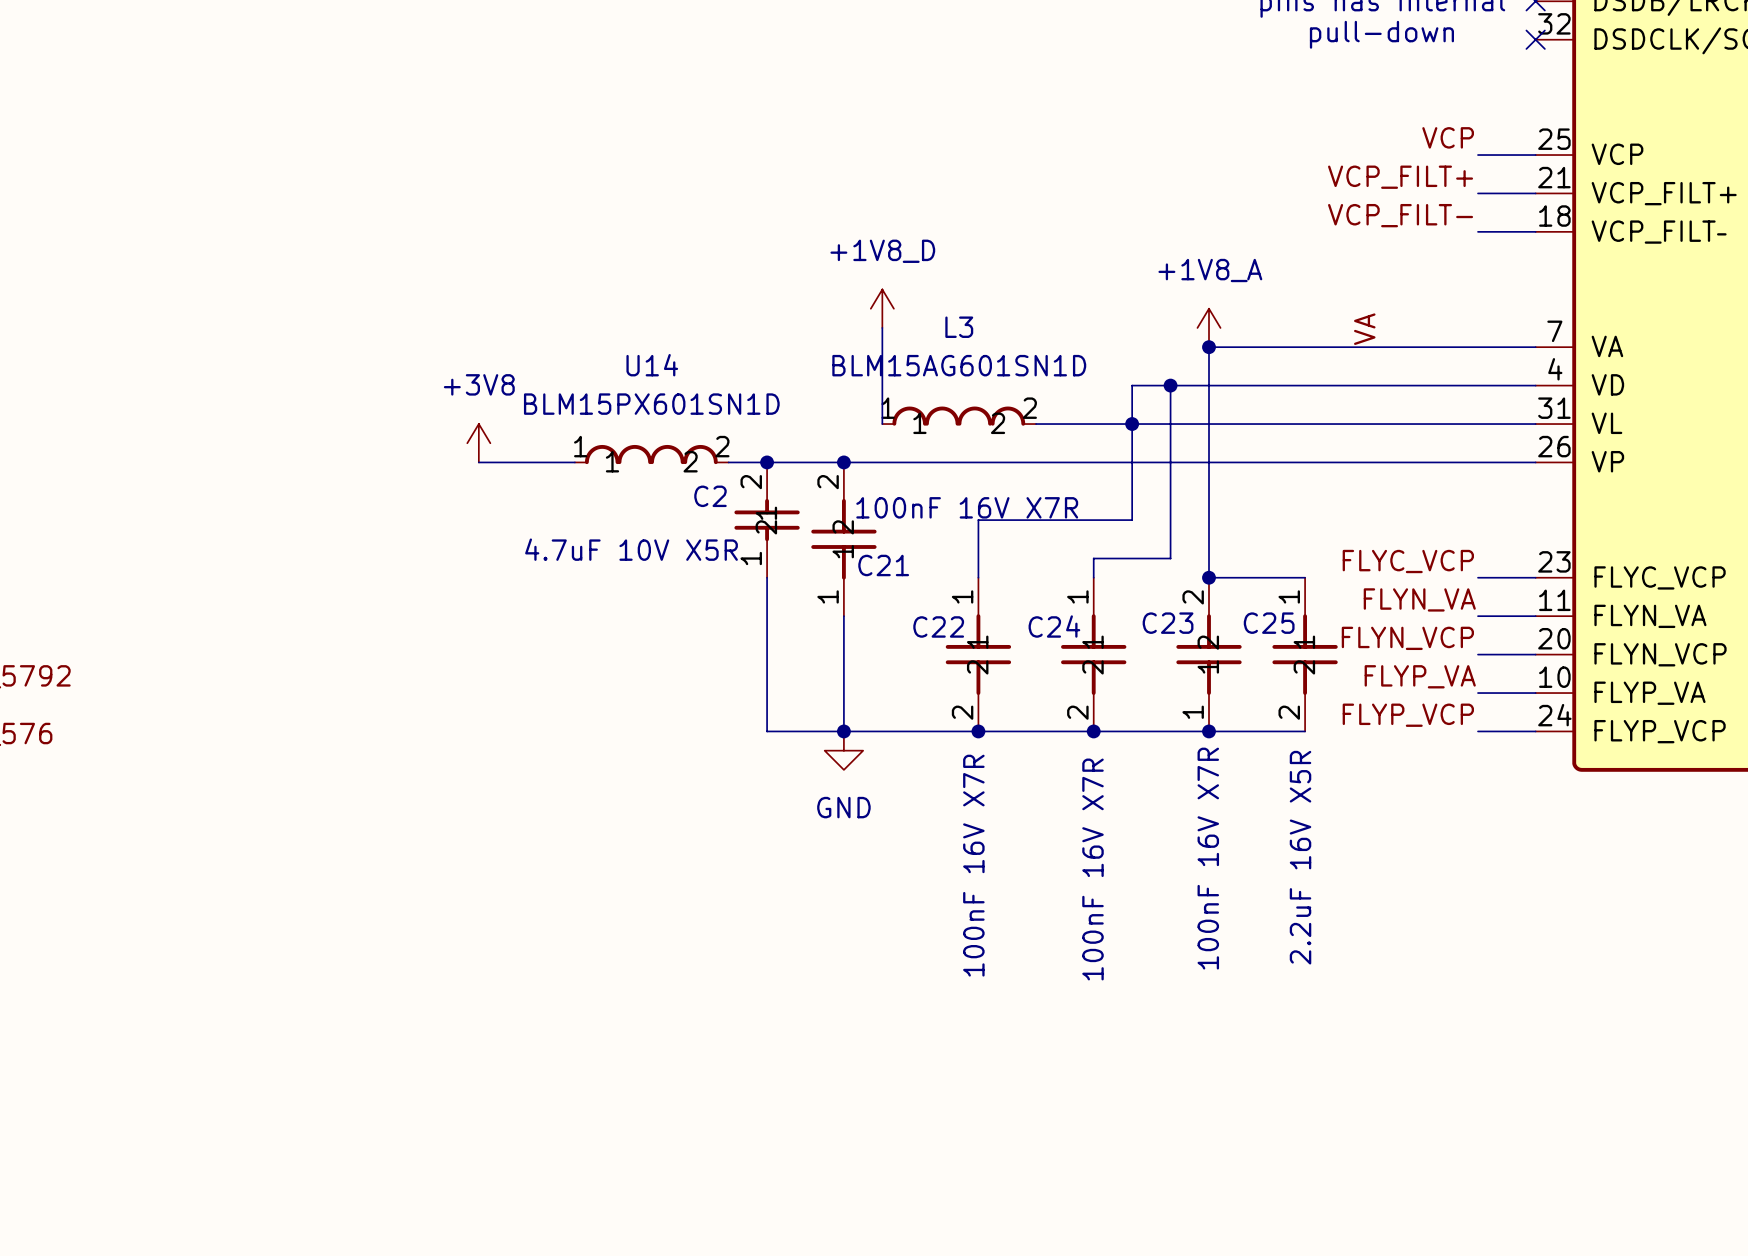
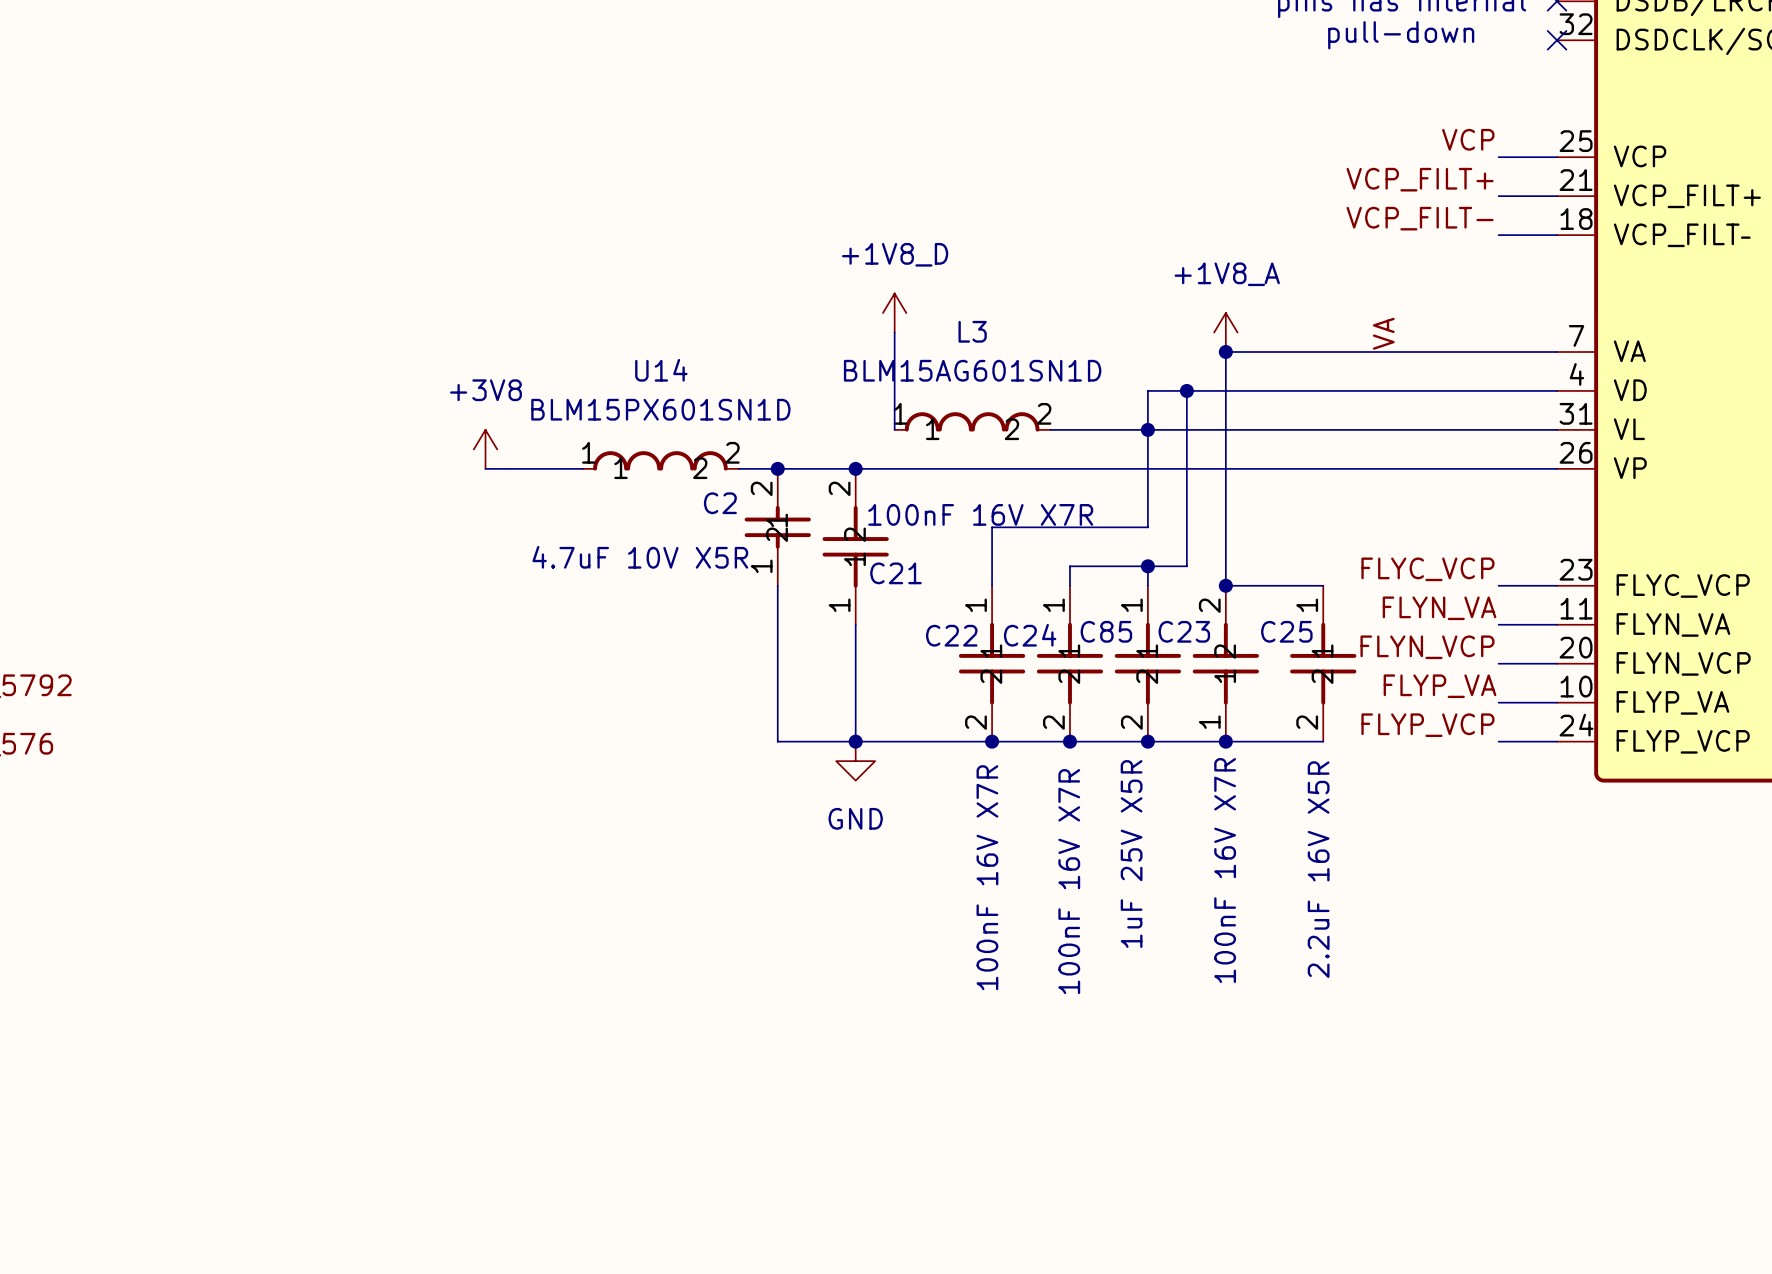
wire: (1093, 558) (1093, 577) -> (1108, 566) (1069, 566) (1069, 585)
wire: none -> (1147, 566) (1147, 585)
junction: none -> (1147, 566)
C24 position: (1093, 654) -> (1069, 663)
C85: none -> 1uF 25V X5R (1147, 663)
junction: none -> (1069, 741)
junction: (1093, 731) -> none
junction: none -> (1147, 741)

